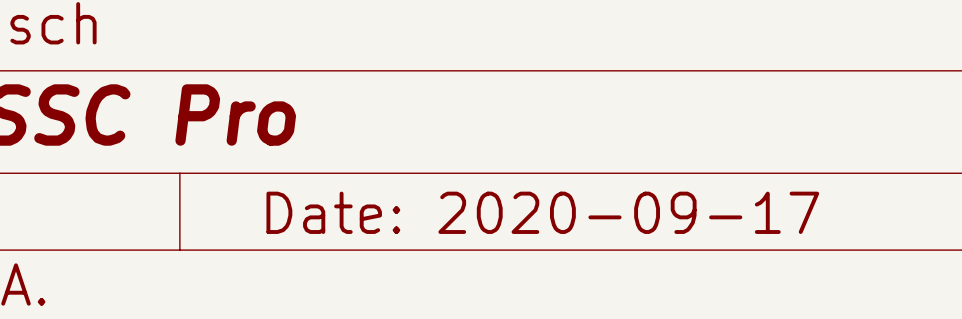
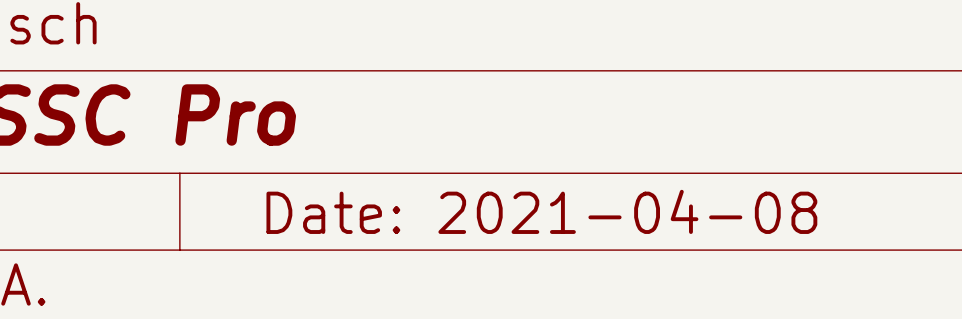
title block: Date: 2020-09-17 (542, 212) -> Date: 2021-04-08 (541, 211)

